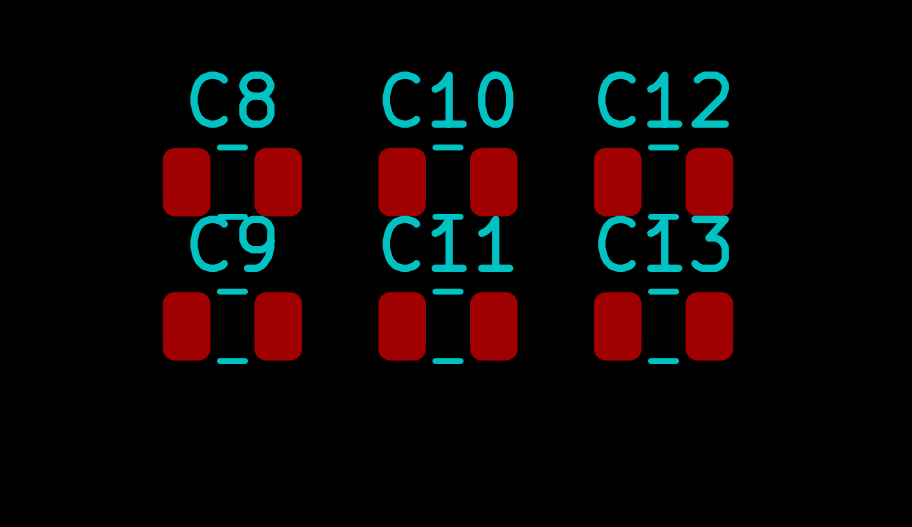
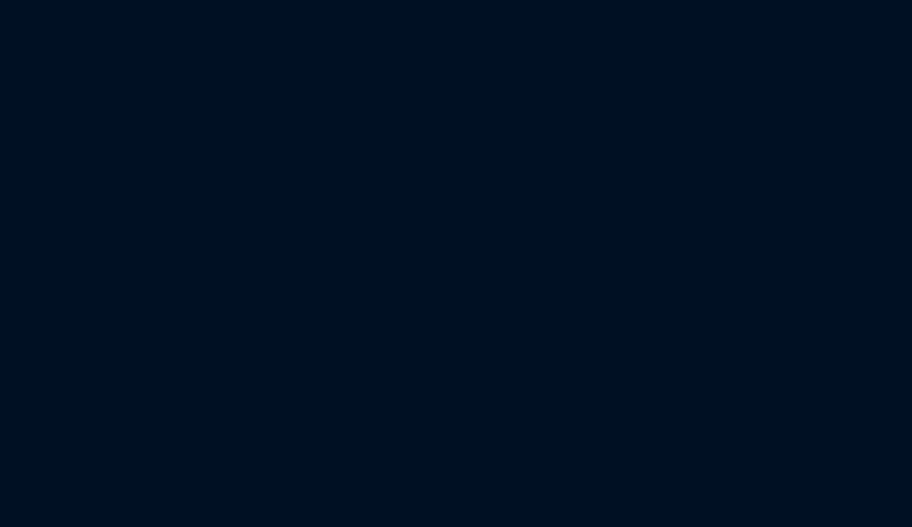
C8: (232, 182) -> none
C10: (448, 182) -> none
C12: (663, 182) -> none
C9: (232, 326) -> none
C11: (448, 326) -> none
C13: (663, 326) -> none

